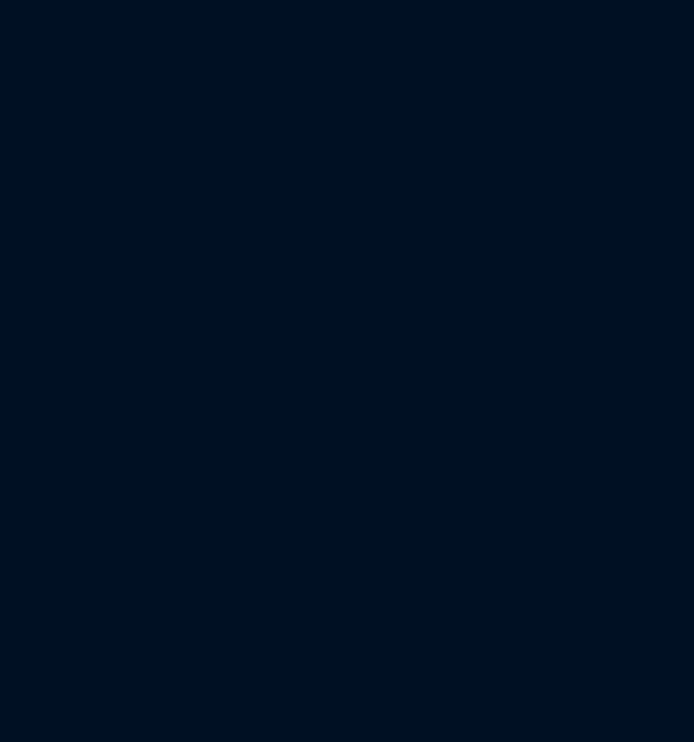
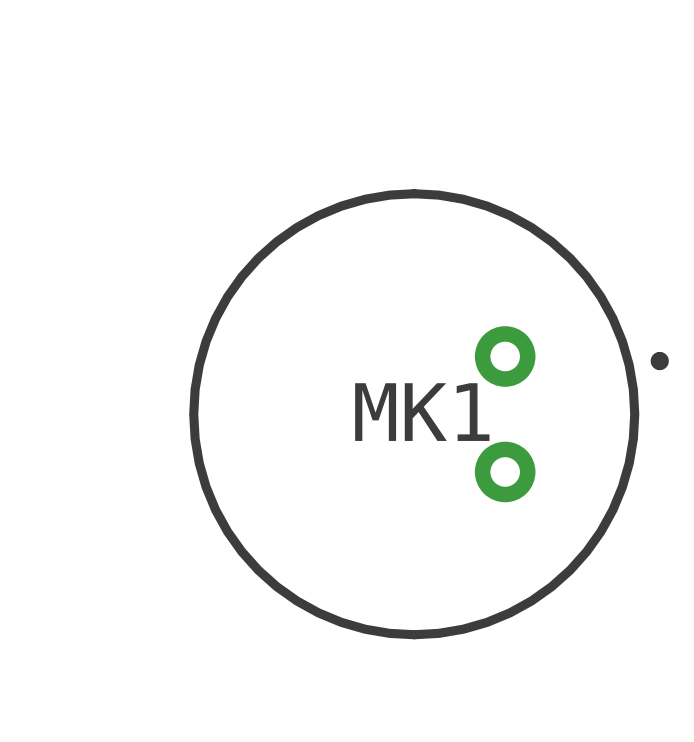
MK1: none -> (429, 414)

